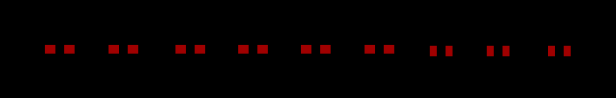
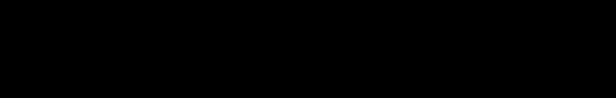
part: (59, 49) -> none
part: (123, 49) -> none
part: (190, 49) -> none
part: (253, 49) -> none
part: (315, 49) -> none
part: (379, 49) -> none
part: (441, 51) -> none
part: (498, 51) -> none
part: (559, 51) -> none

